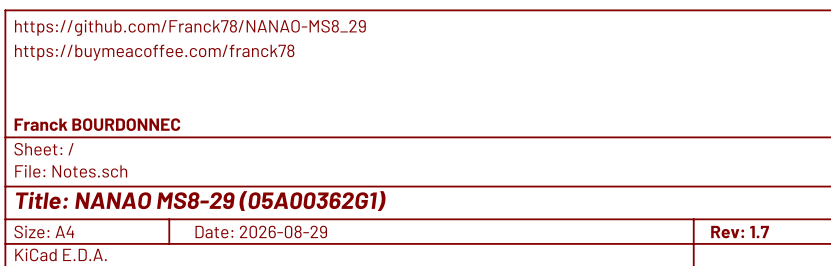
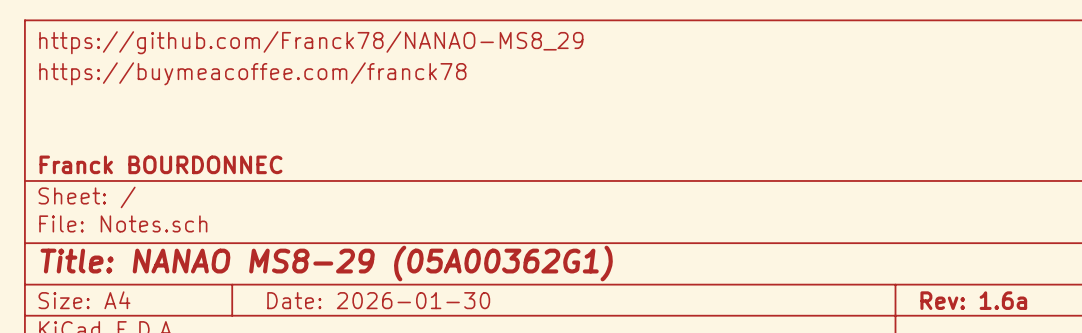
title block: Date: 2026-08-29 (261, 231) -> Date: 2026-01-30 (378, 300)
title block: Rev: 1.7 (740, 232) -> Rev: 1.6a (973, 300)

